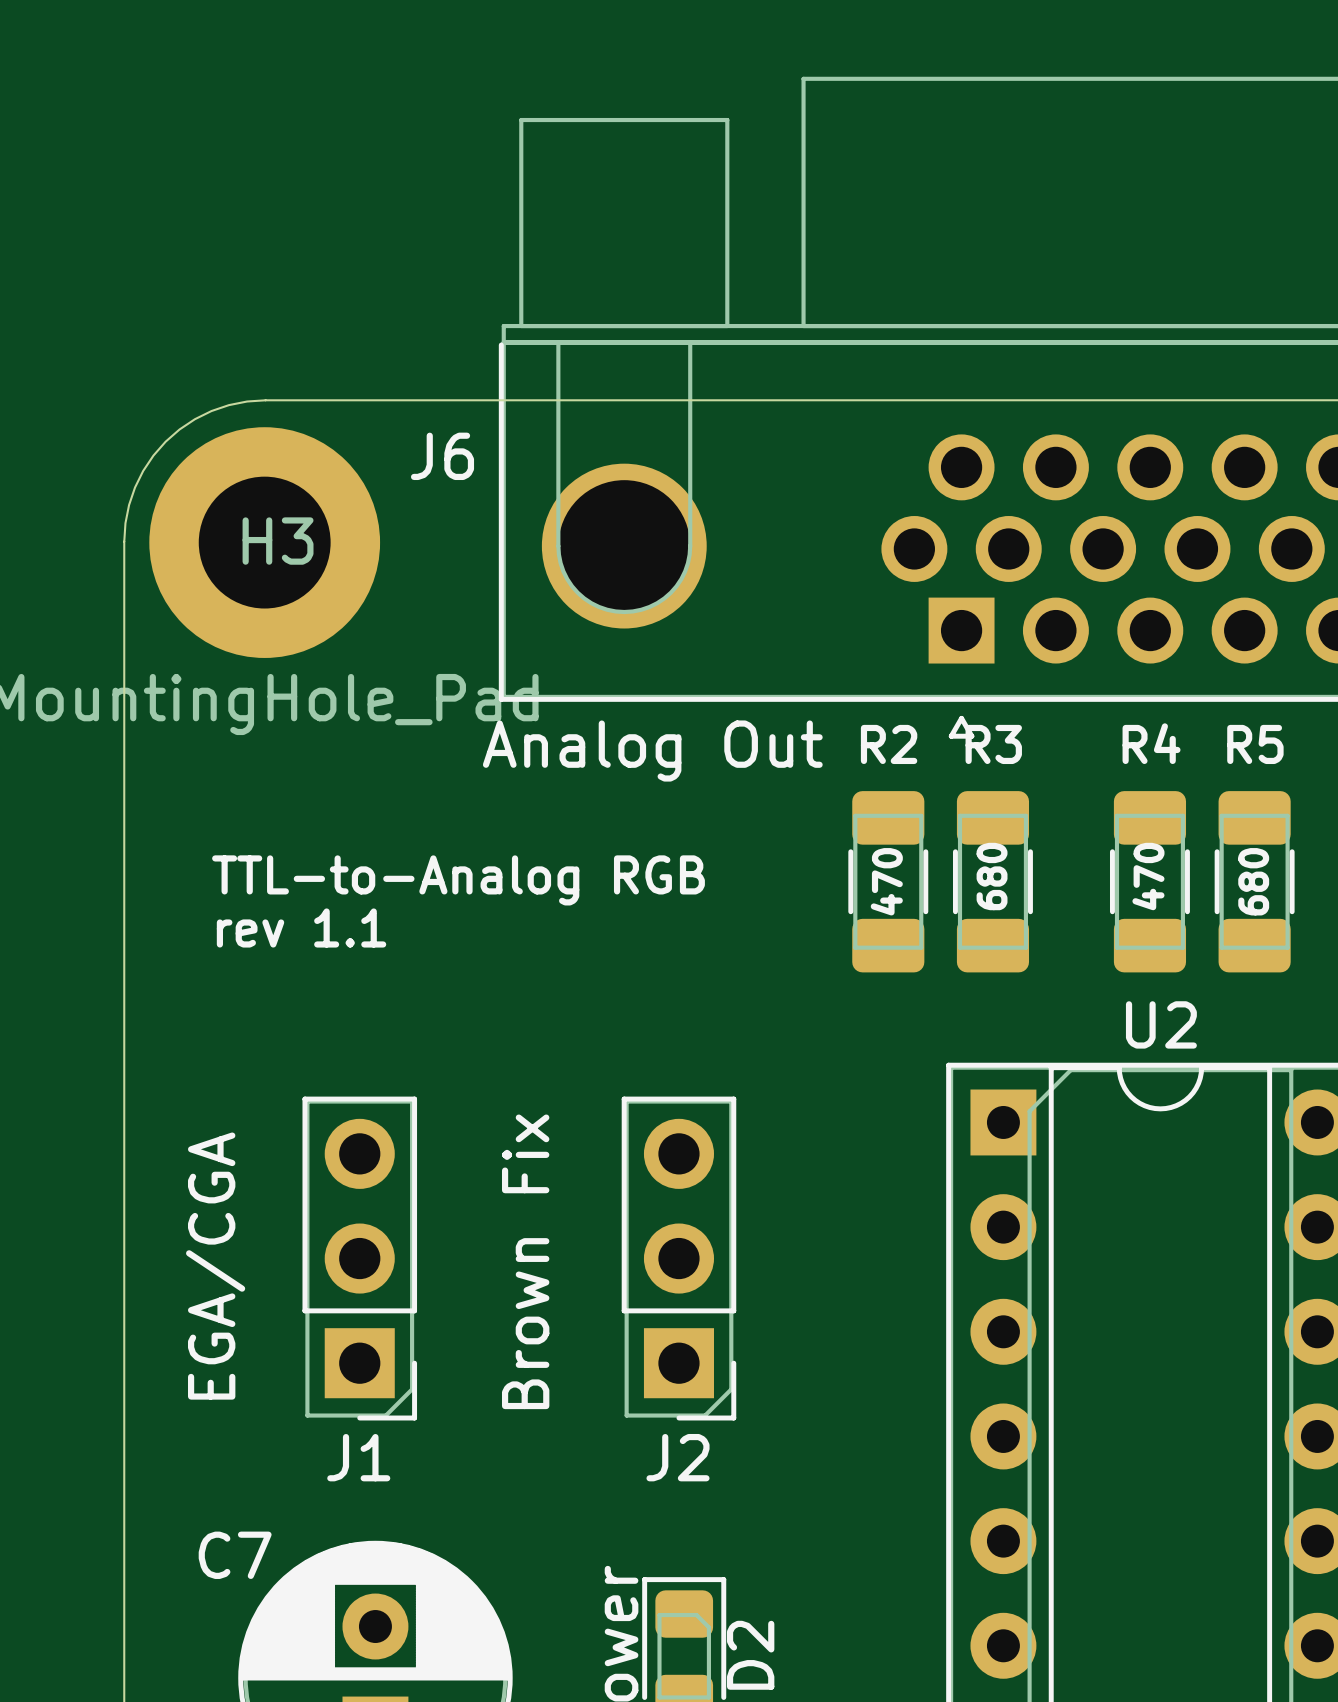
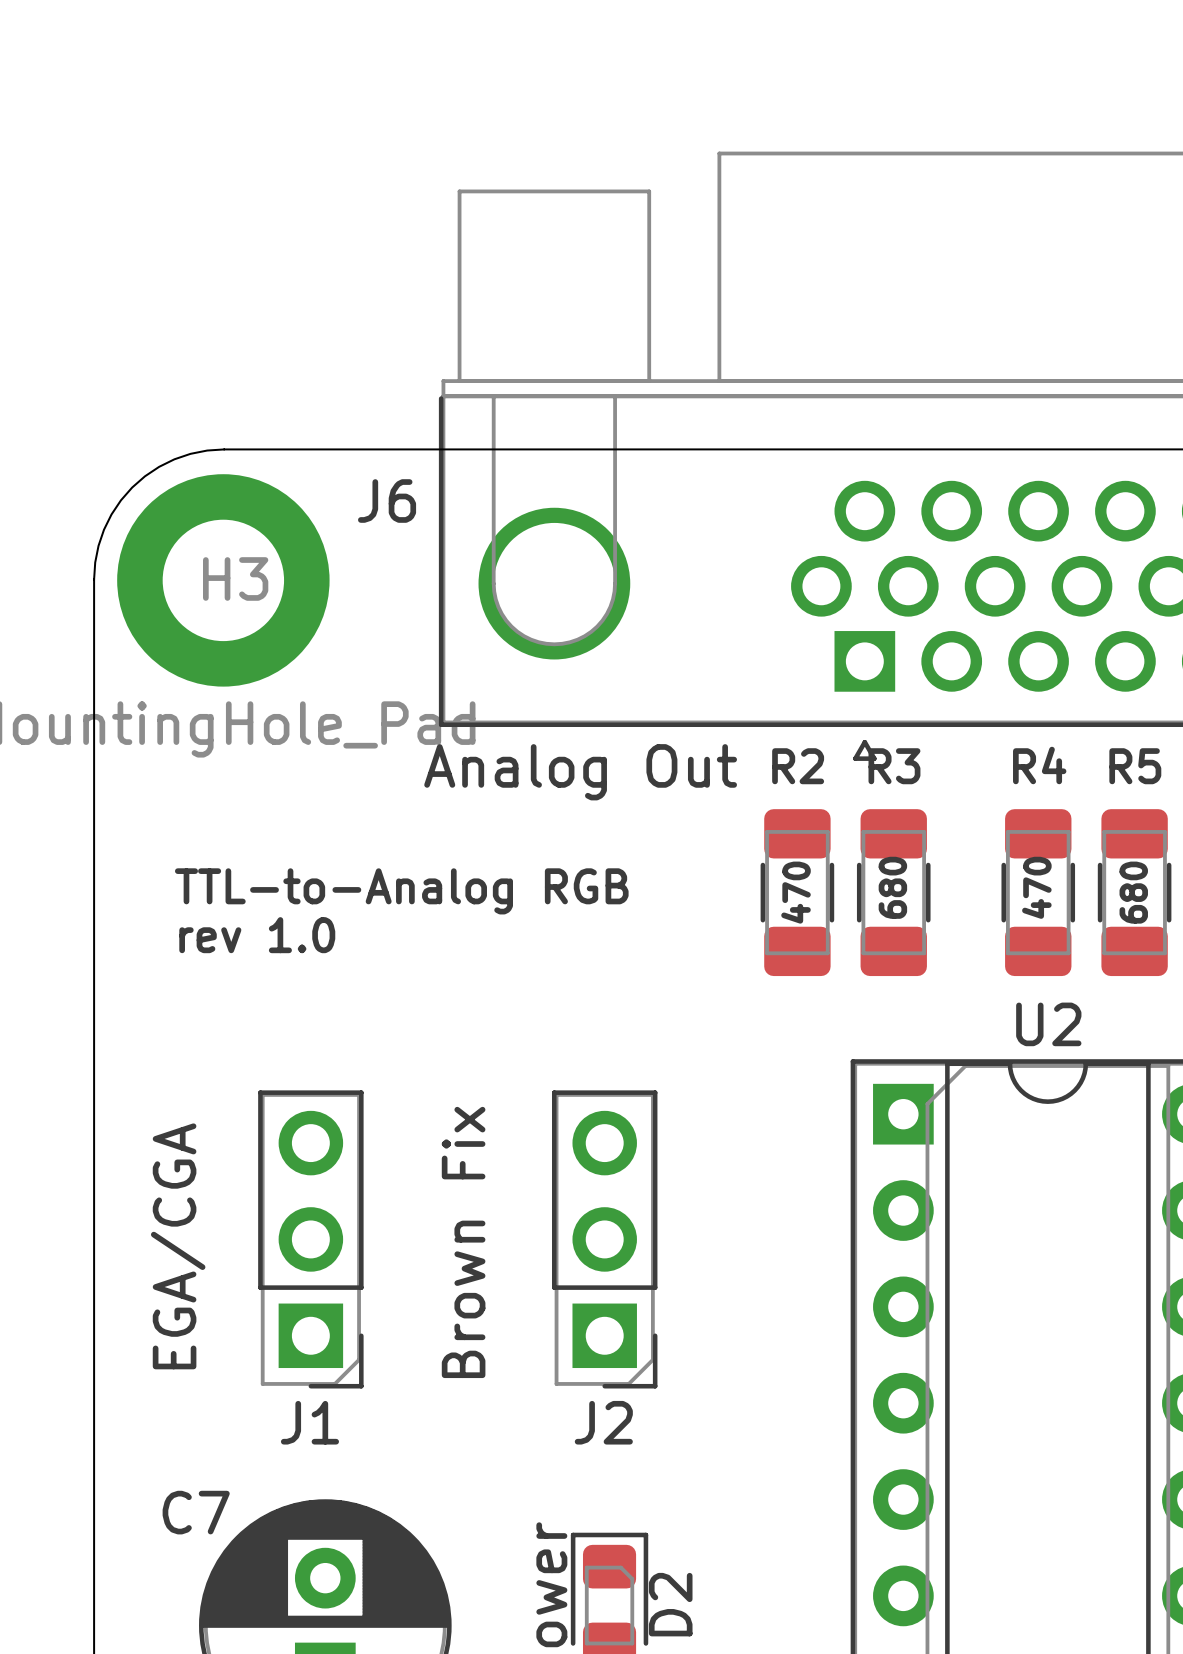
text: rev 1.1 (301, 927) -> rev 1.0 (257, 935)

